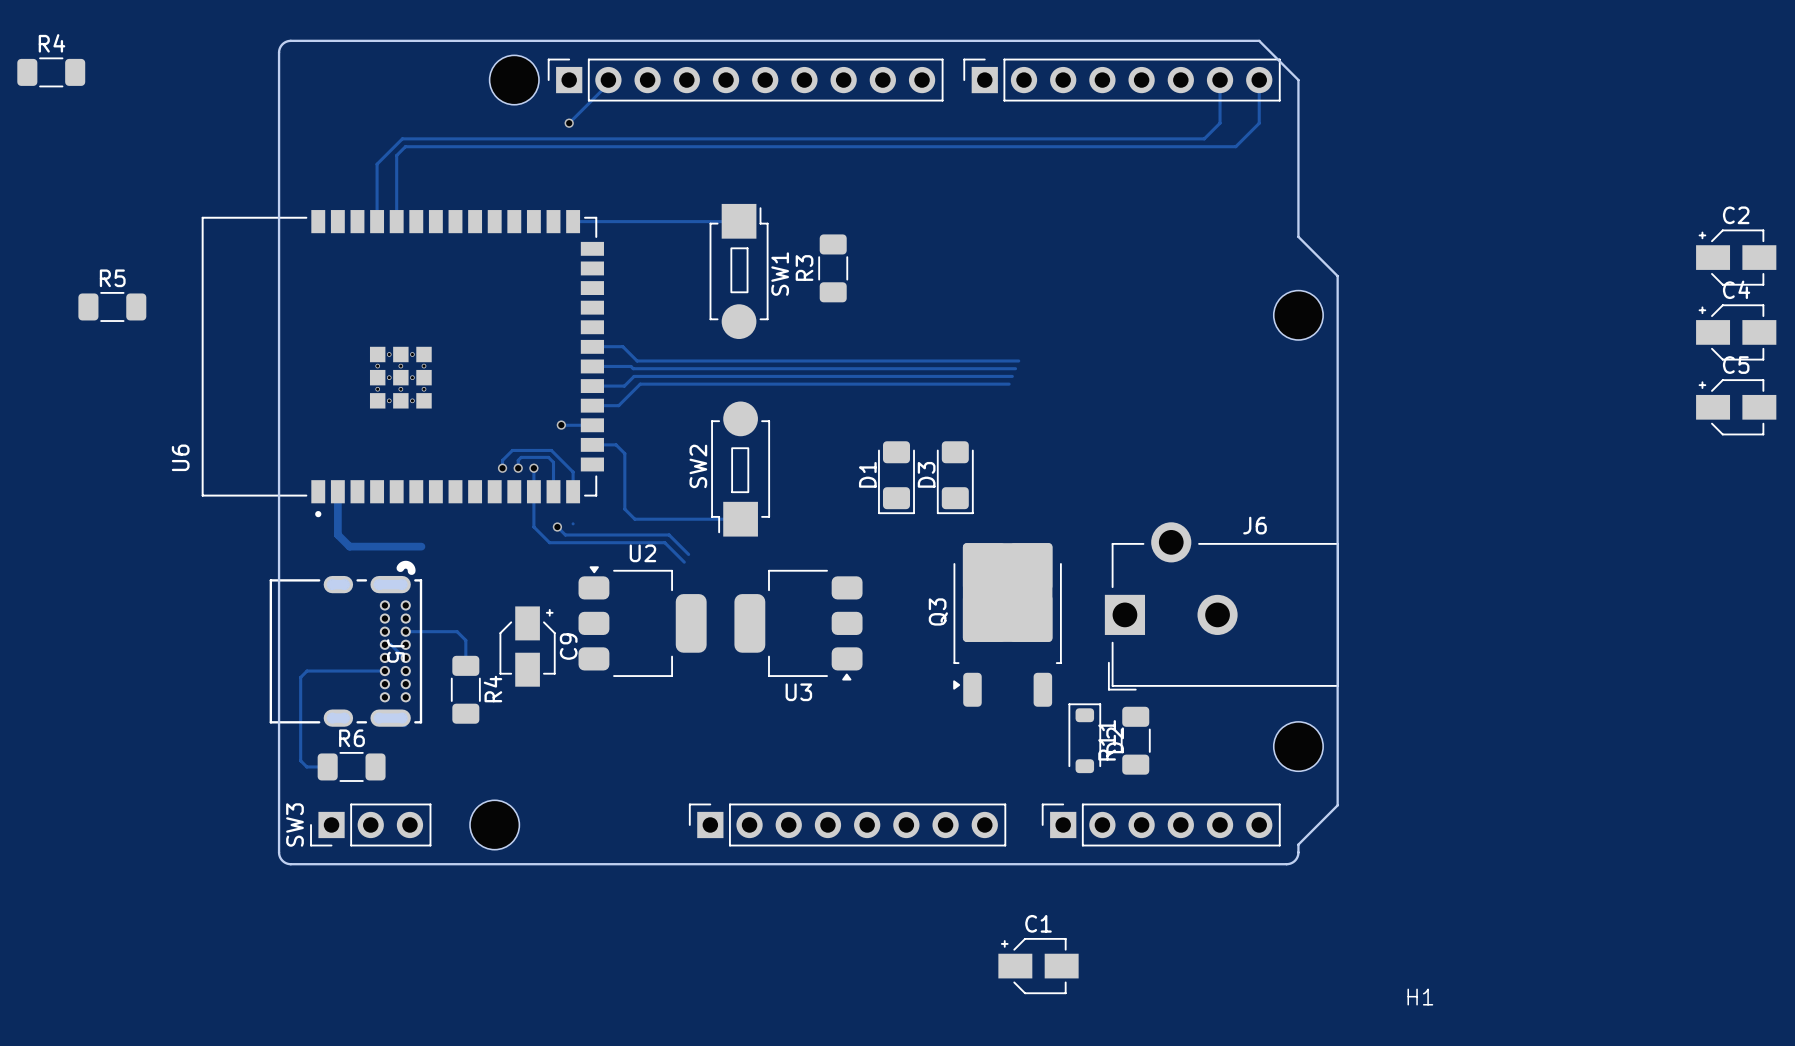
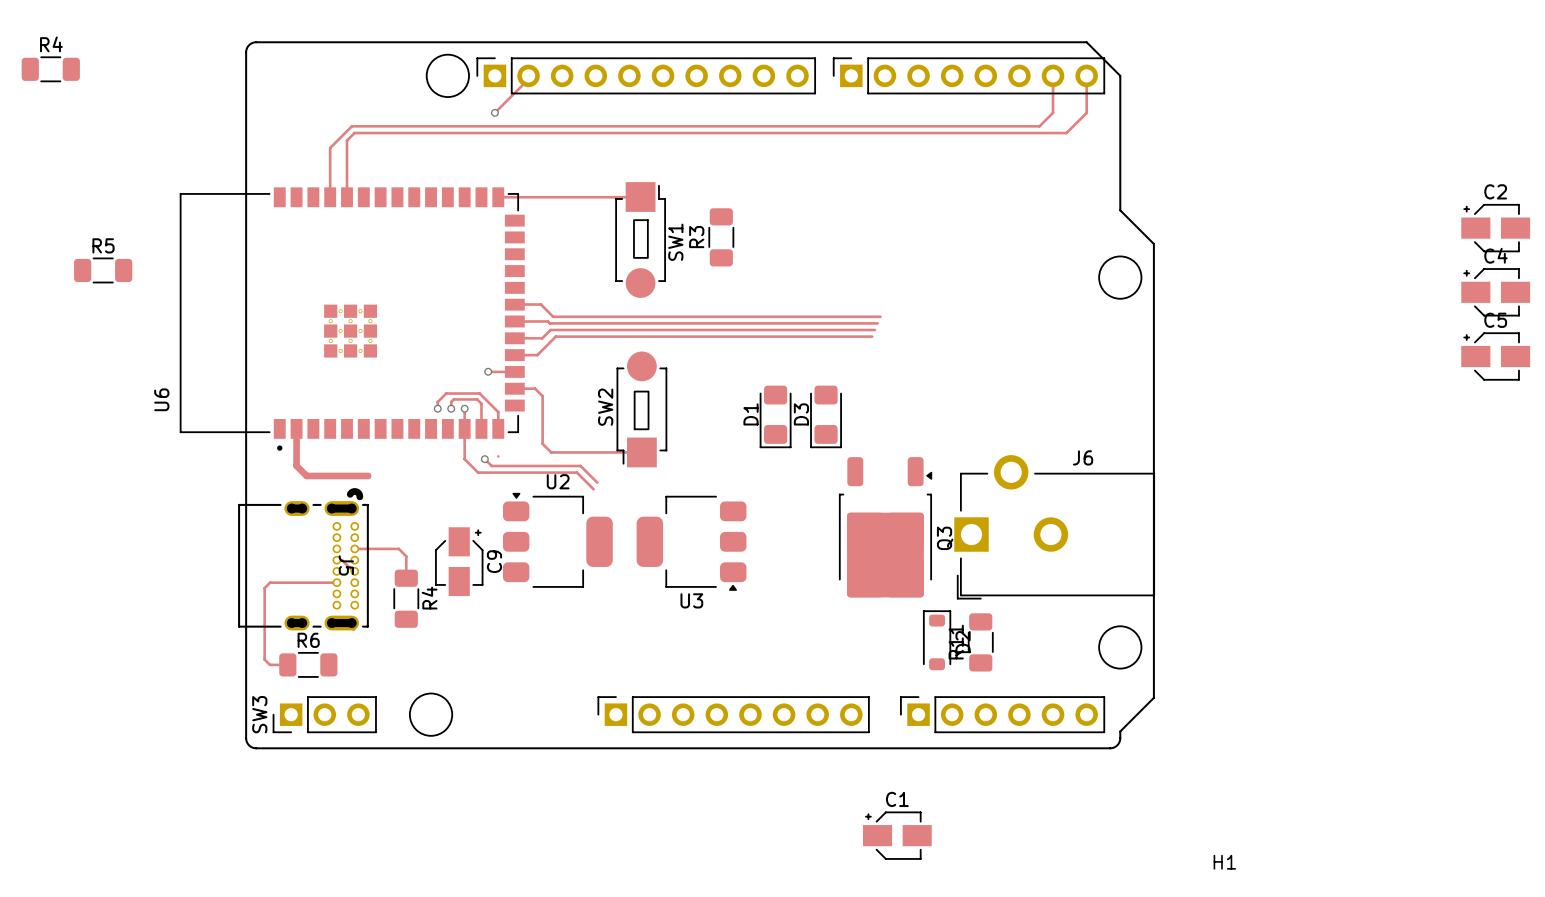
Q3 rotation: 0° (1007, 624) -> 180° (885, 527)

